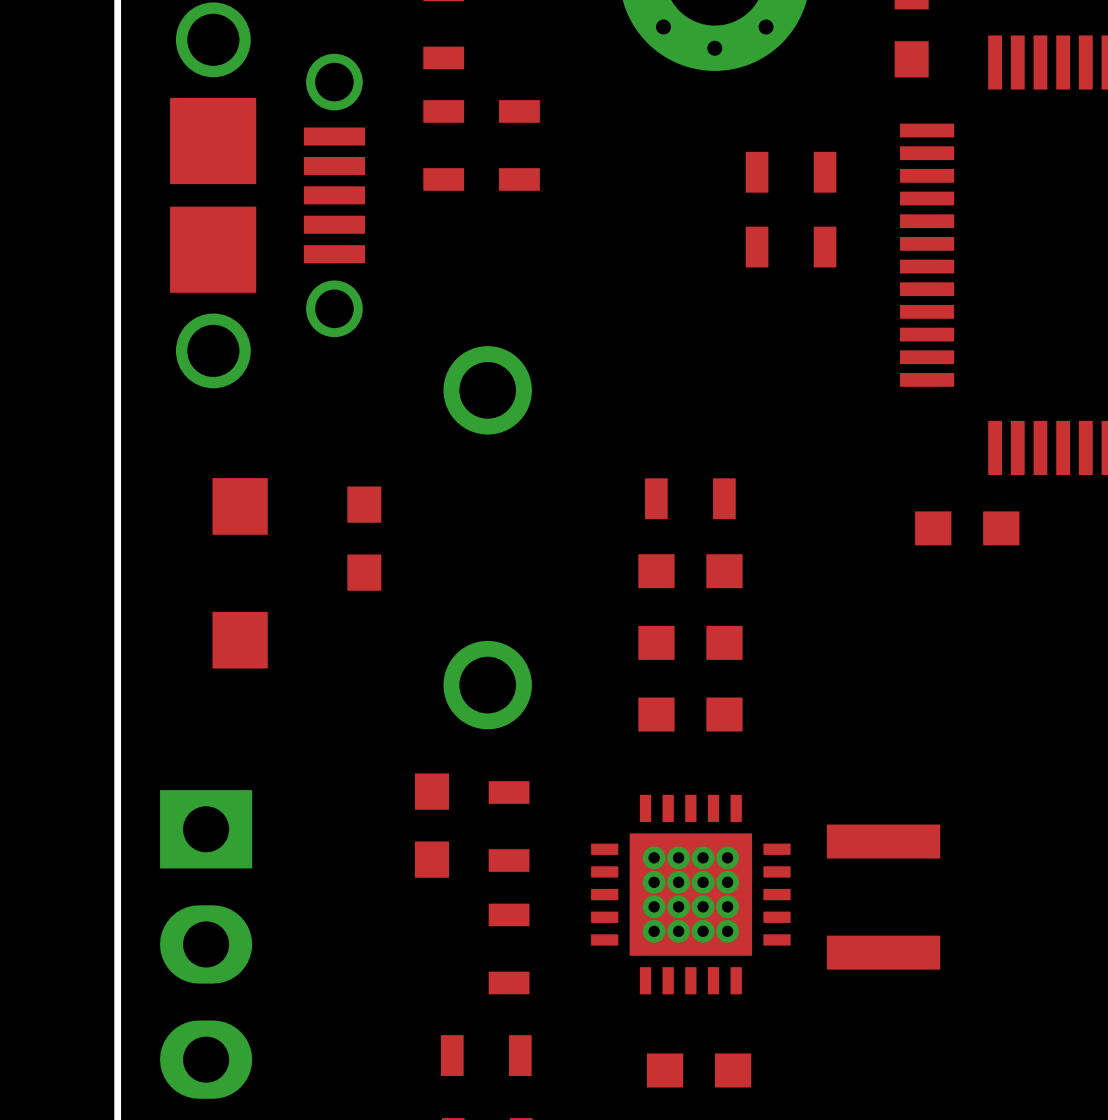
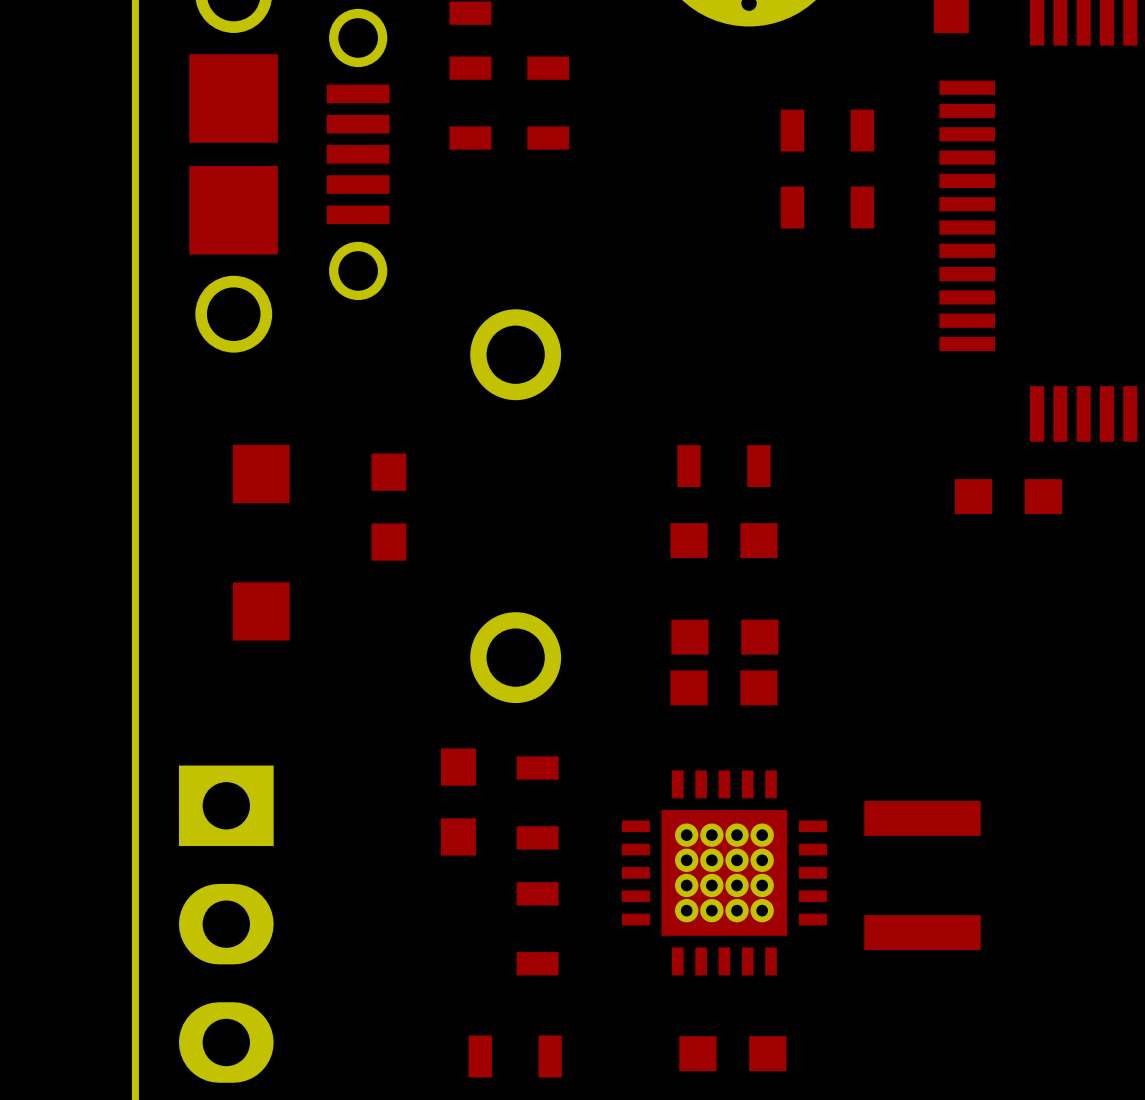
part position: (690, 642) -> (724, 637)
part position: (486, 1055) -> (515, 1056)

